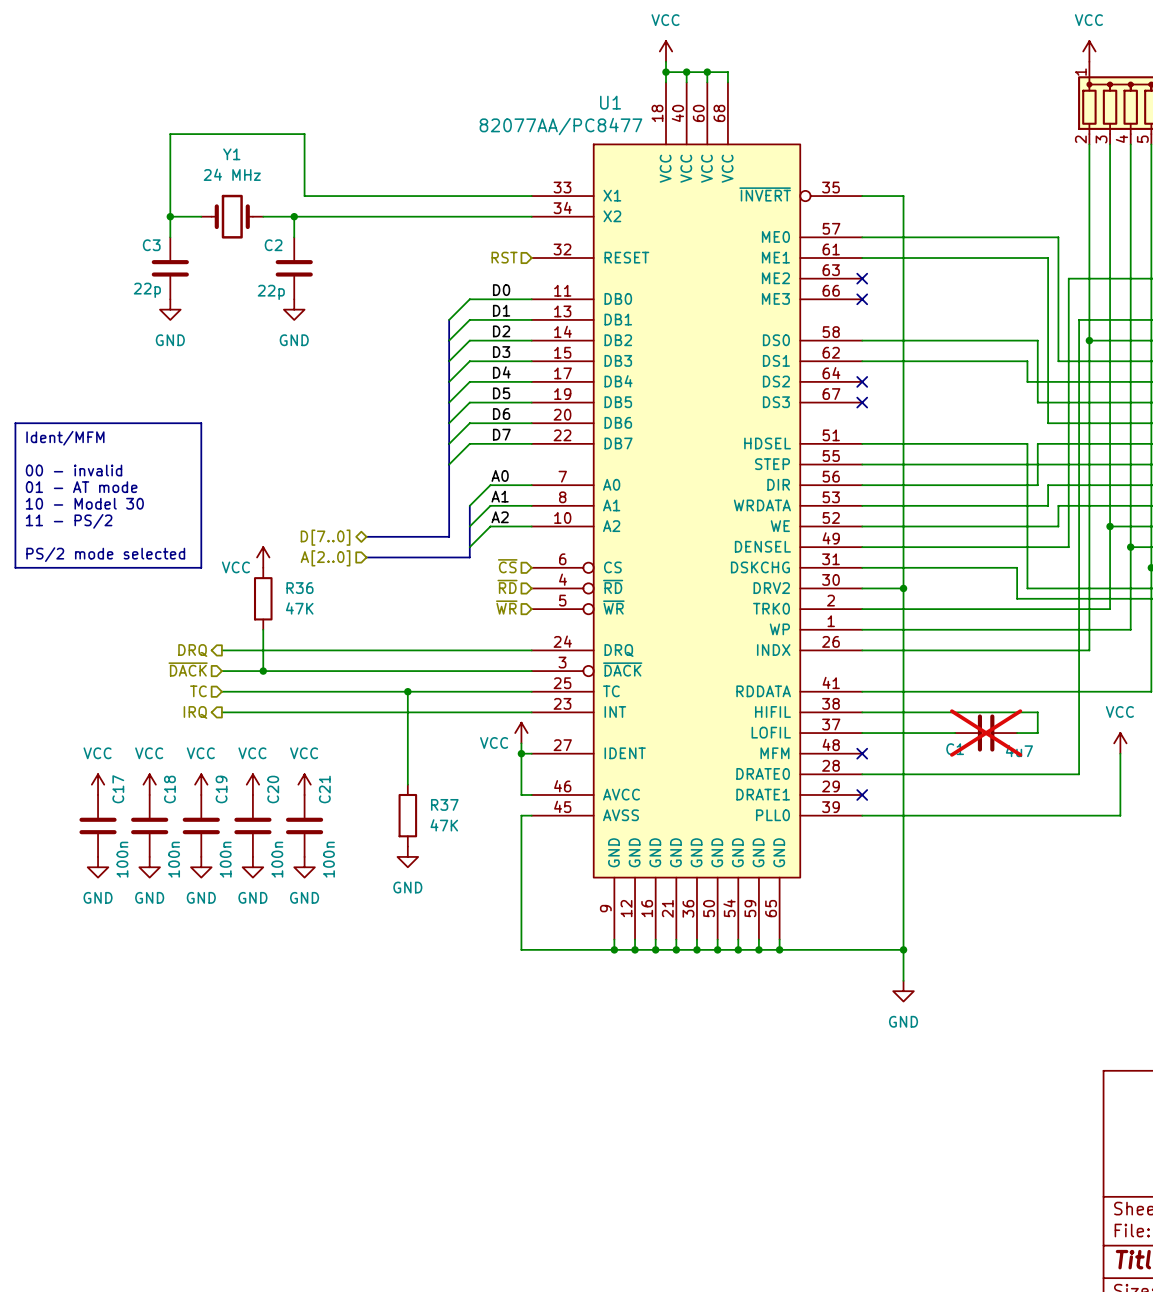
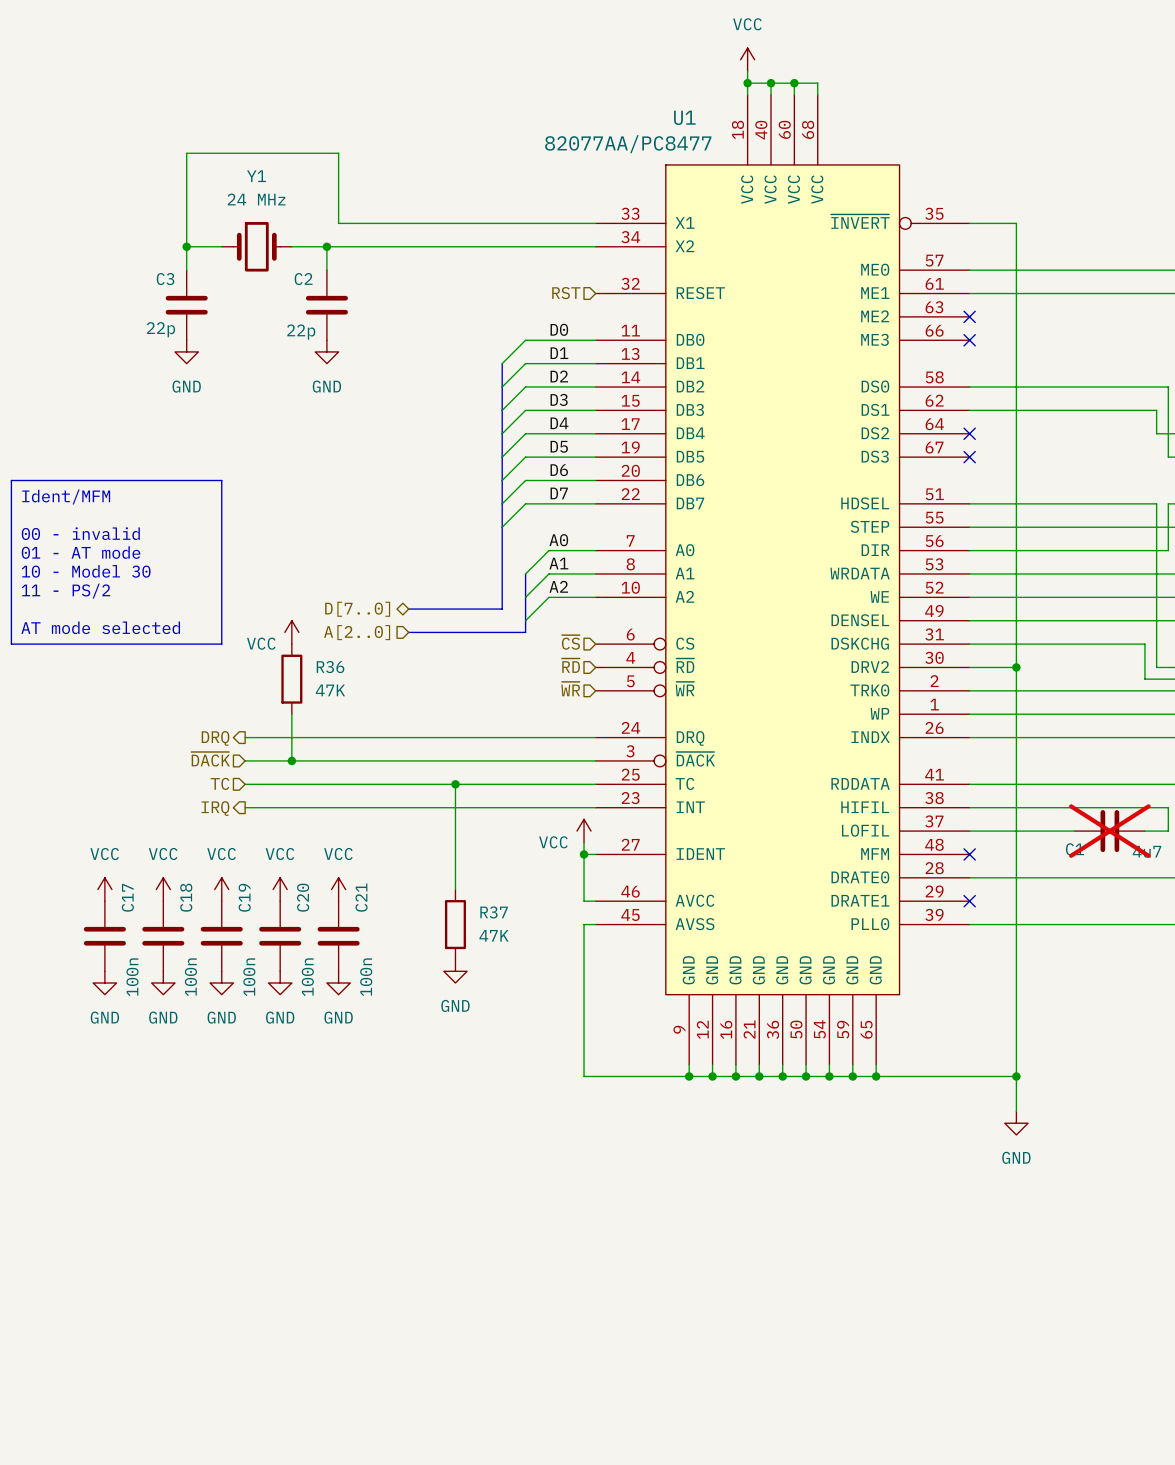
text: PS/2 mode selected (105, 554) -> AT mode selected (100, 627)

